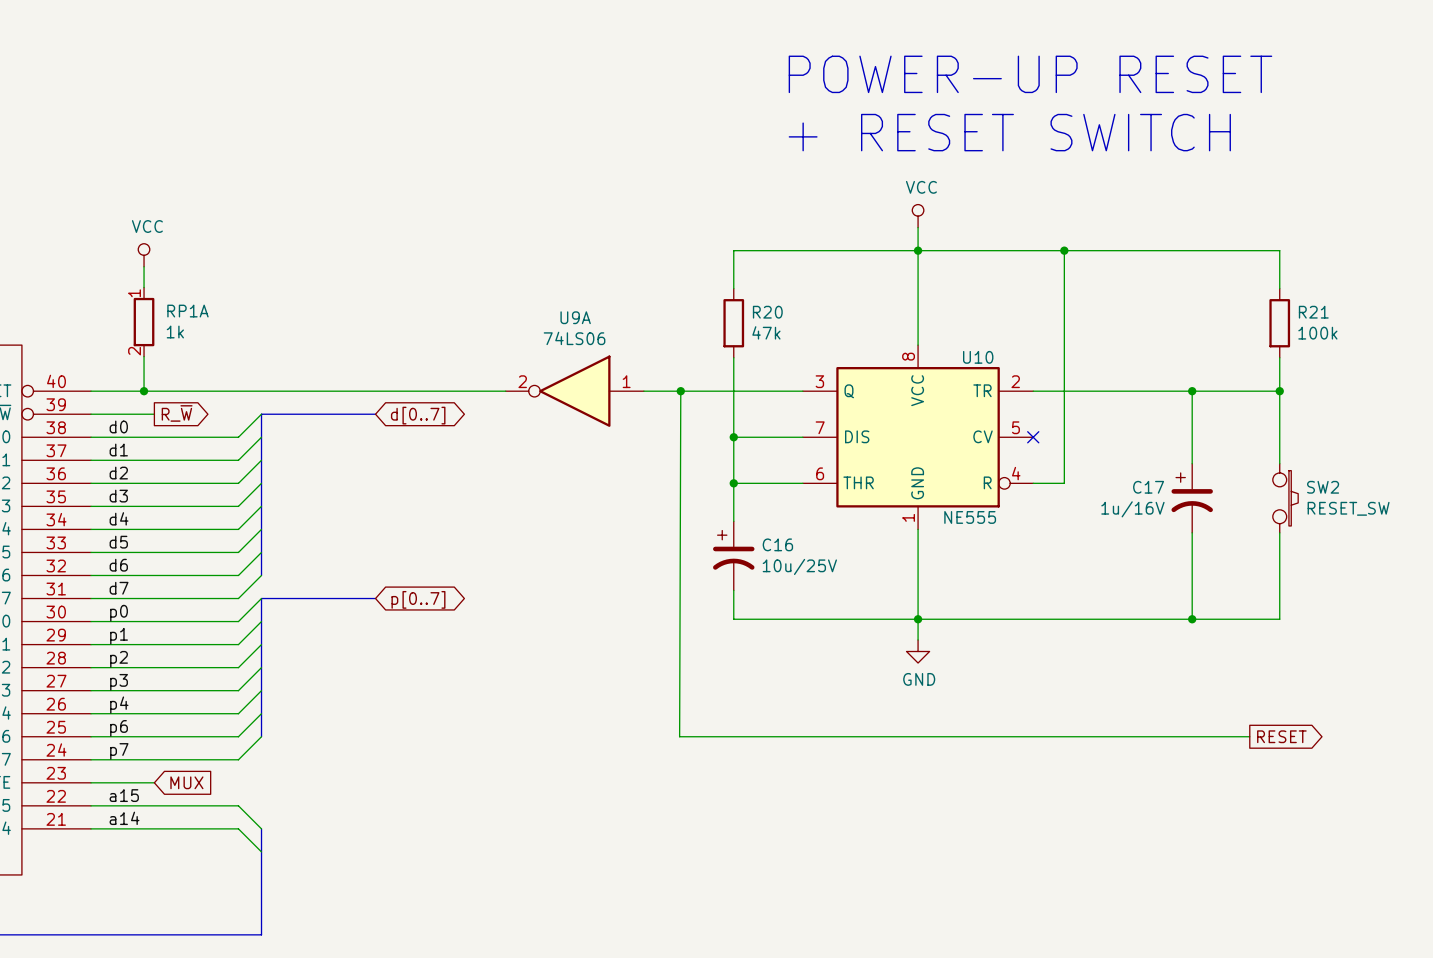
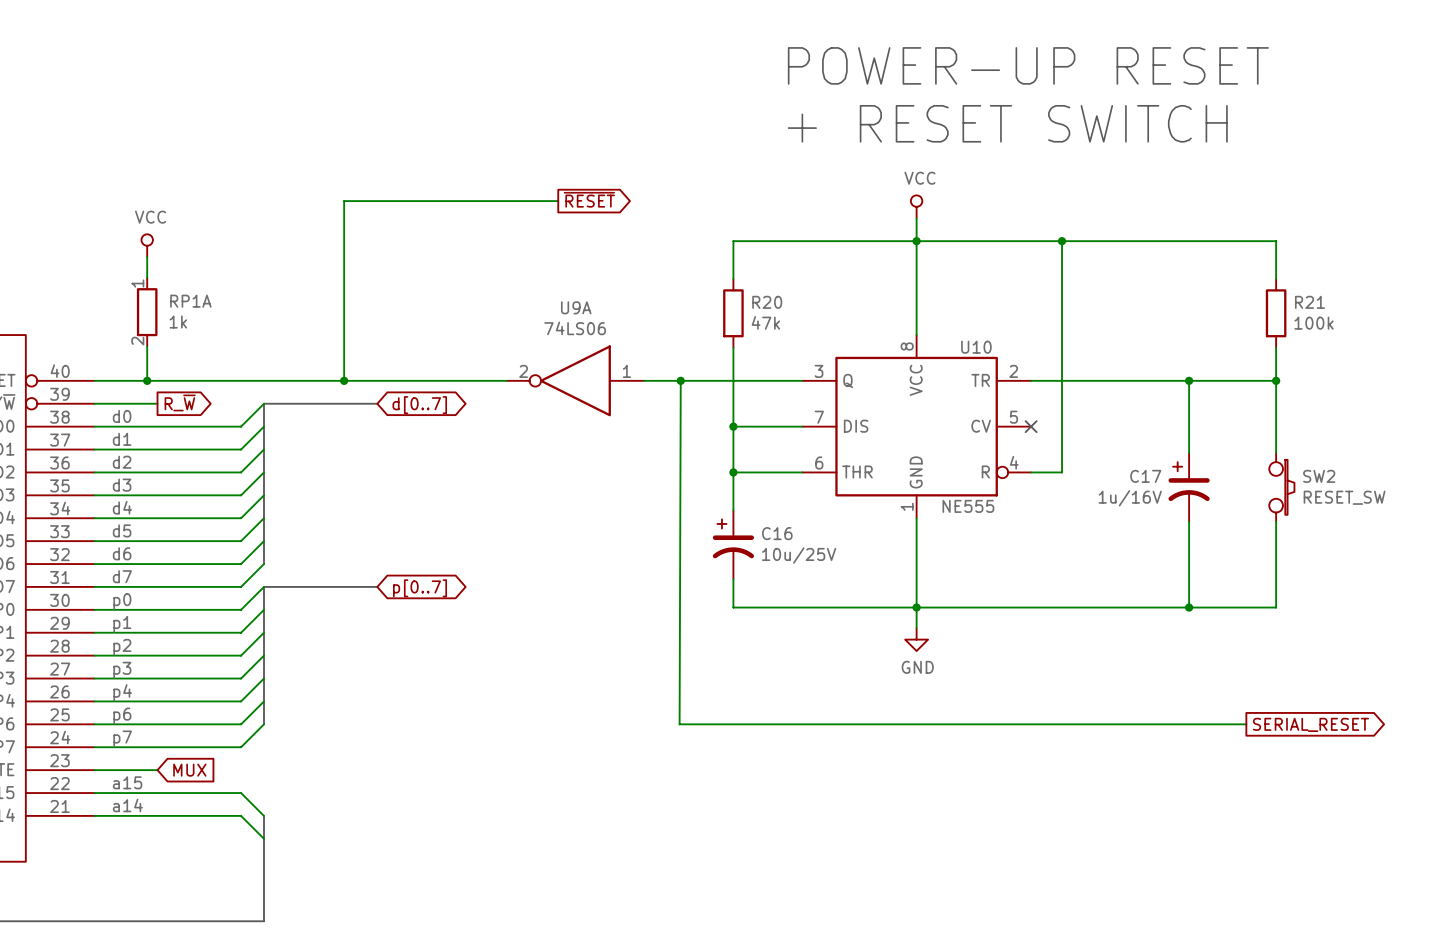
global label: none -> ~{RESET} (589, 199)
wire: none -> (558, 201) (344, 201) (344, 380)
junction: none -> (344, 380)
global label: RESET (1281, 736) -> SERIAL_RESET (1310, 724)

